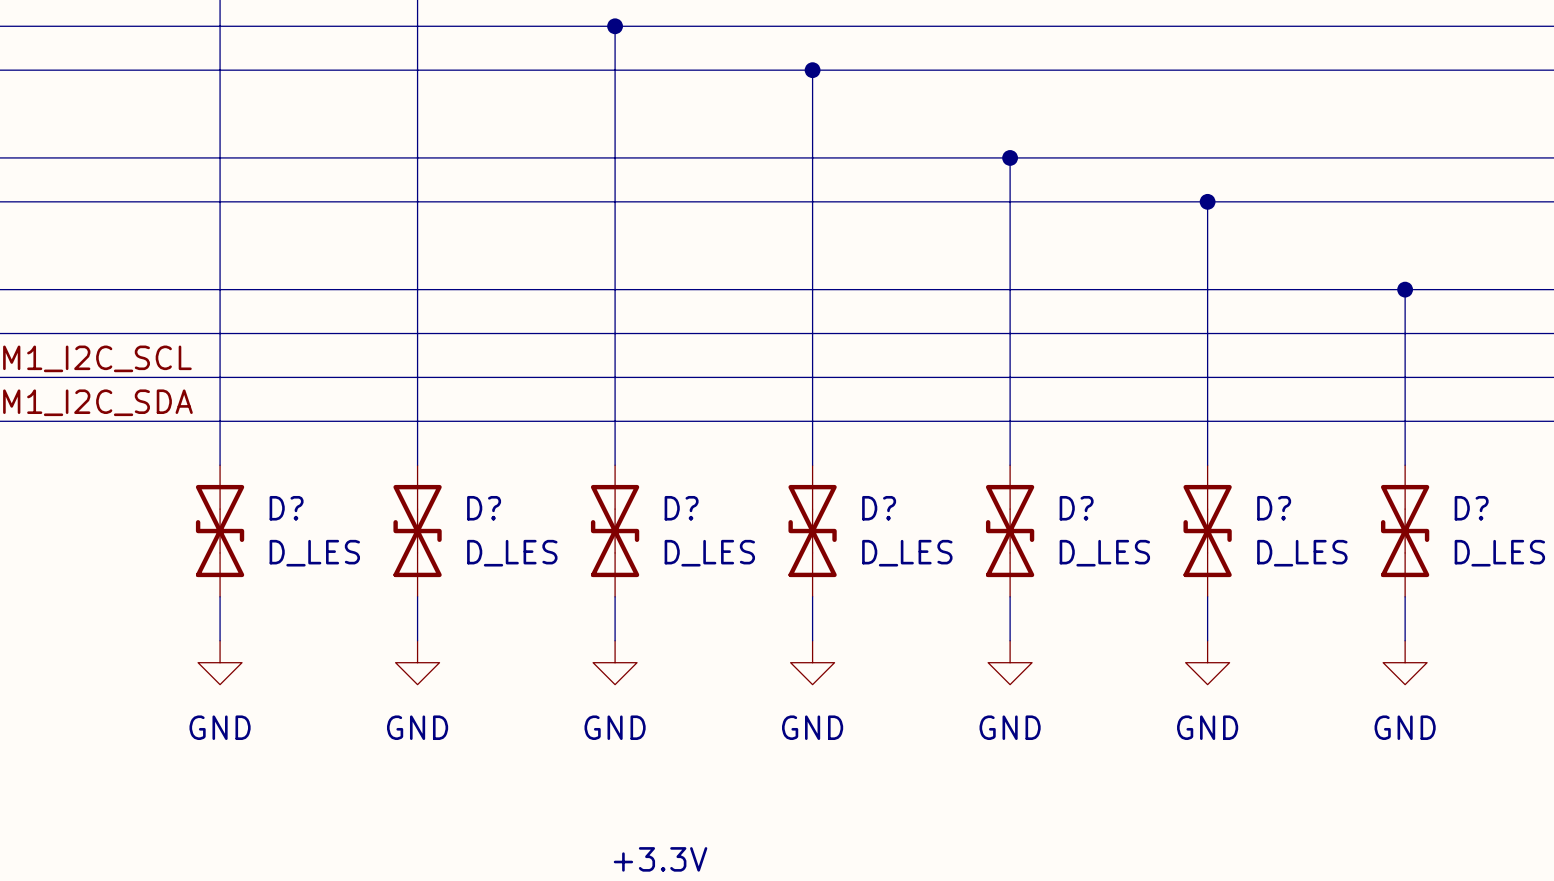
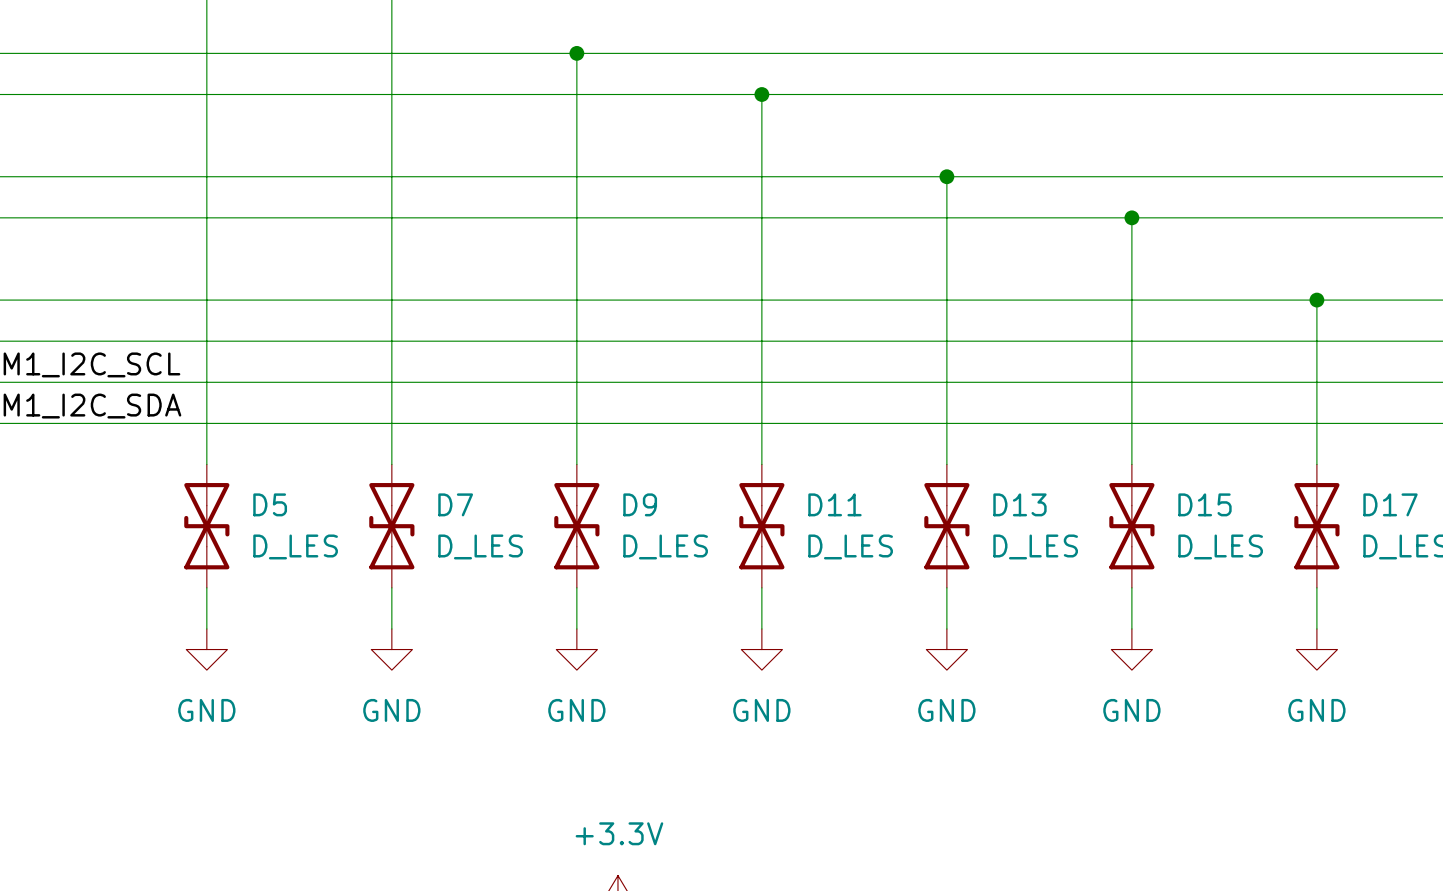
D? name: D? (286, 508) -> D5 (270, 504)
D? name: D? (484, 508) -> D7 (455, 504)
D? name: D? (681, 508) -> D9 (640, 504)
D? name: D? (879, 508) -> D11 (834, 504)
D? name: D? (1076, 508) -> D13 (1019, 504)
D? name: D? (1274, 508) -> D15 (1204, 504)
D? name: D? (1471, 508) -> D17 (1390, 504)

